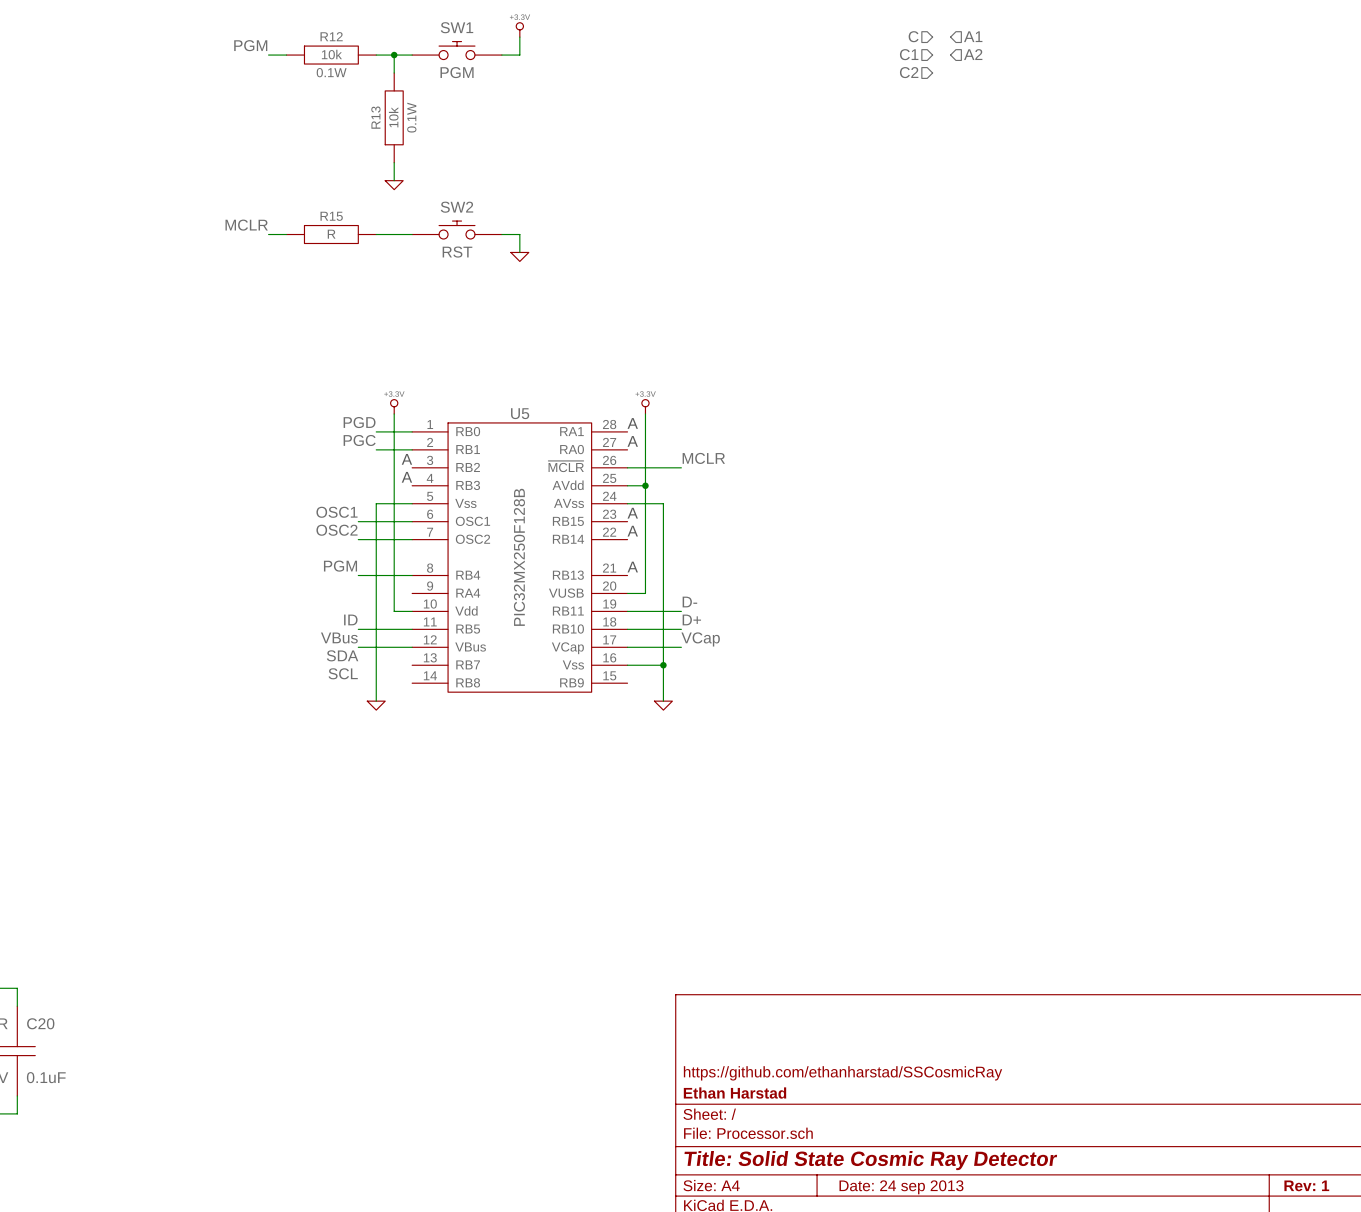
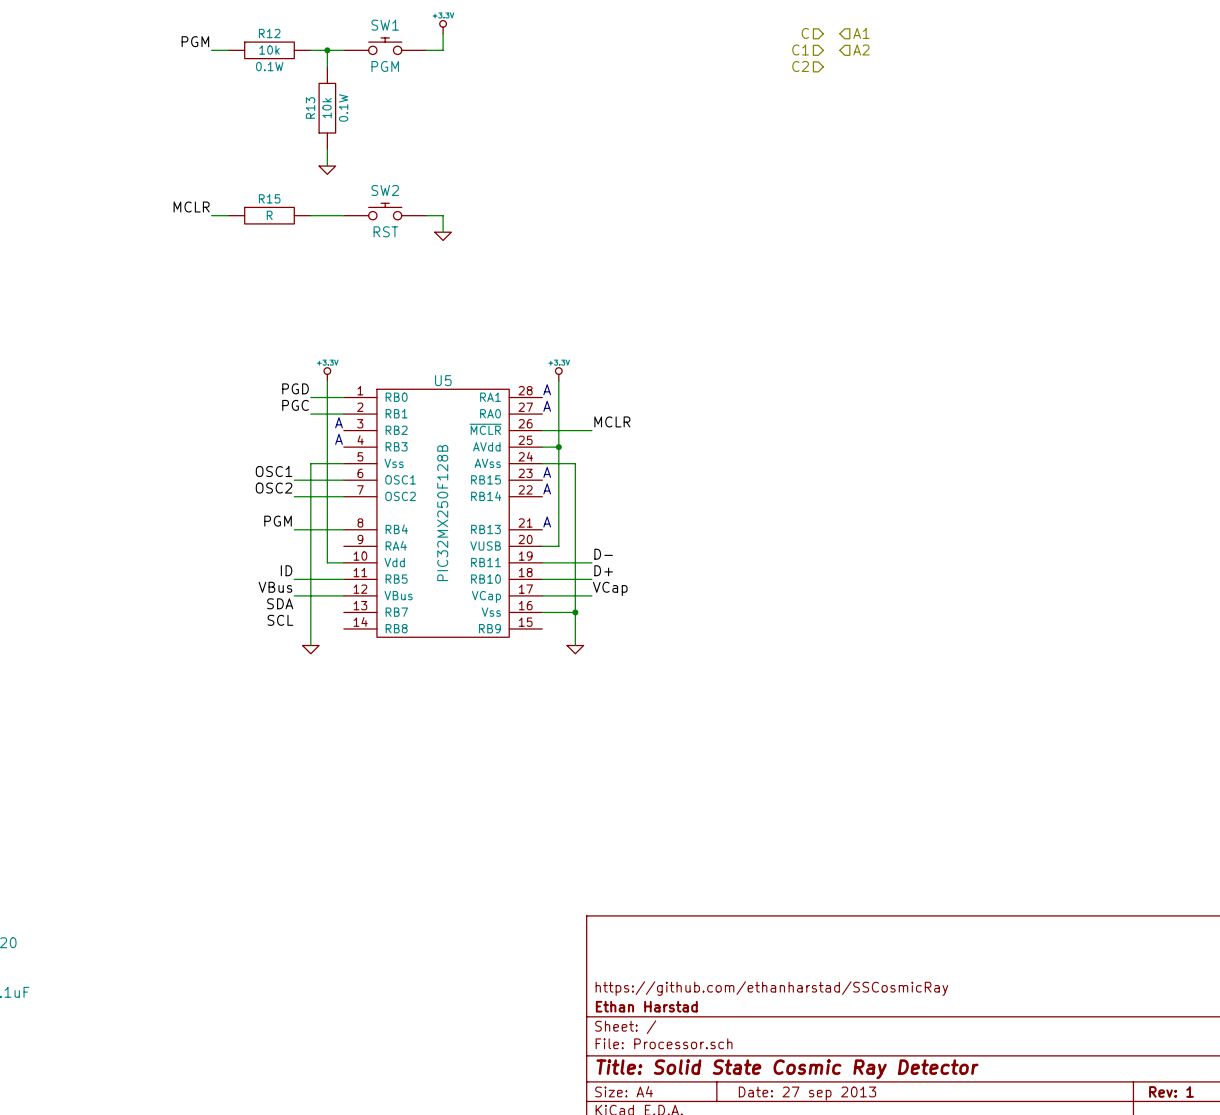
title block: Date: 24 sep 2013 (901, 1187) -> Date: 27 sep 2013 (807, 1093)

